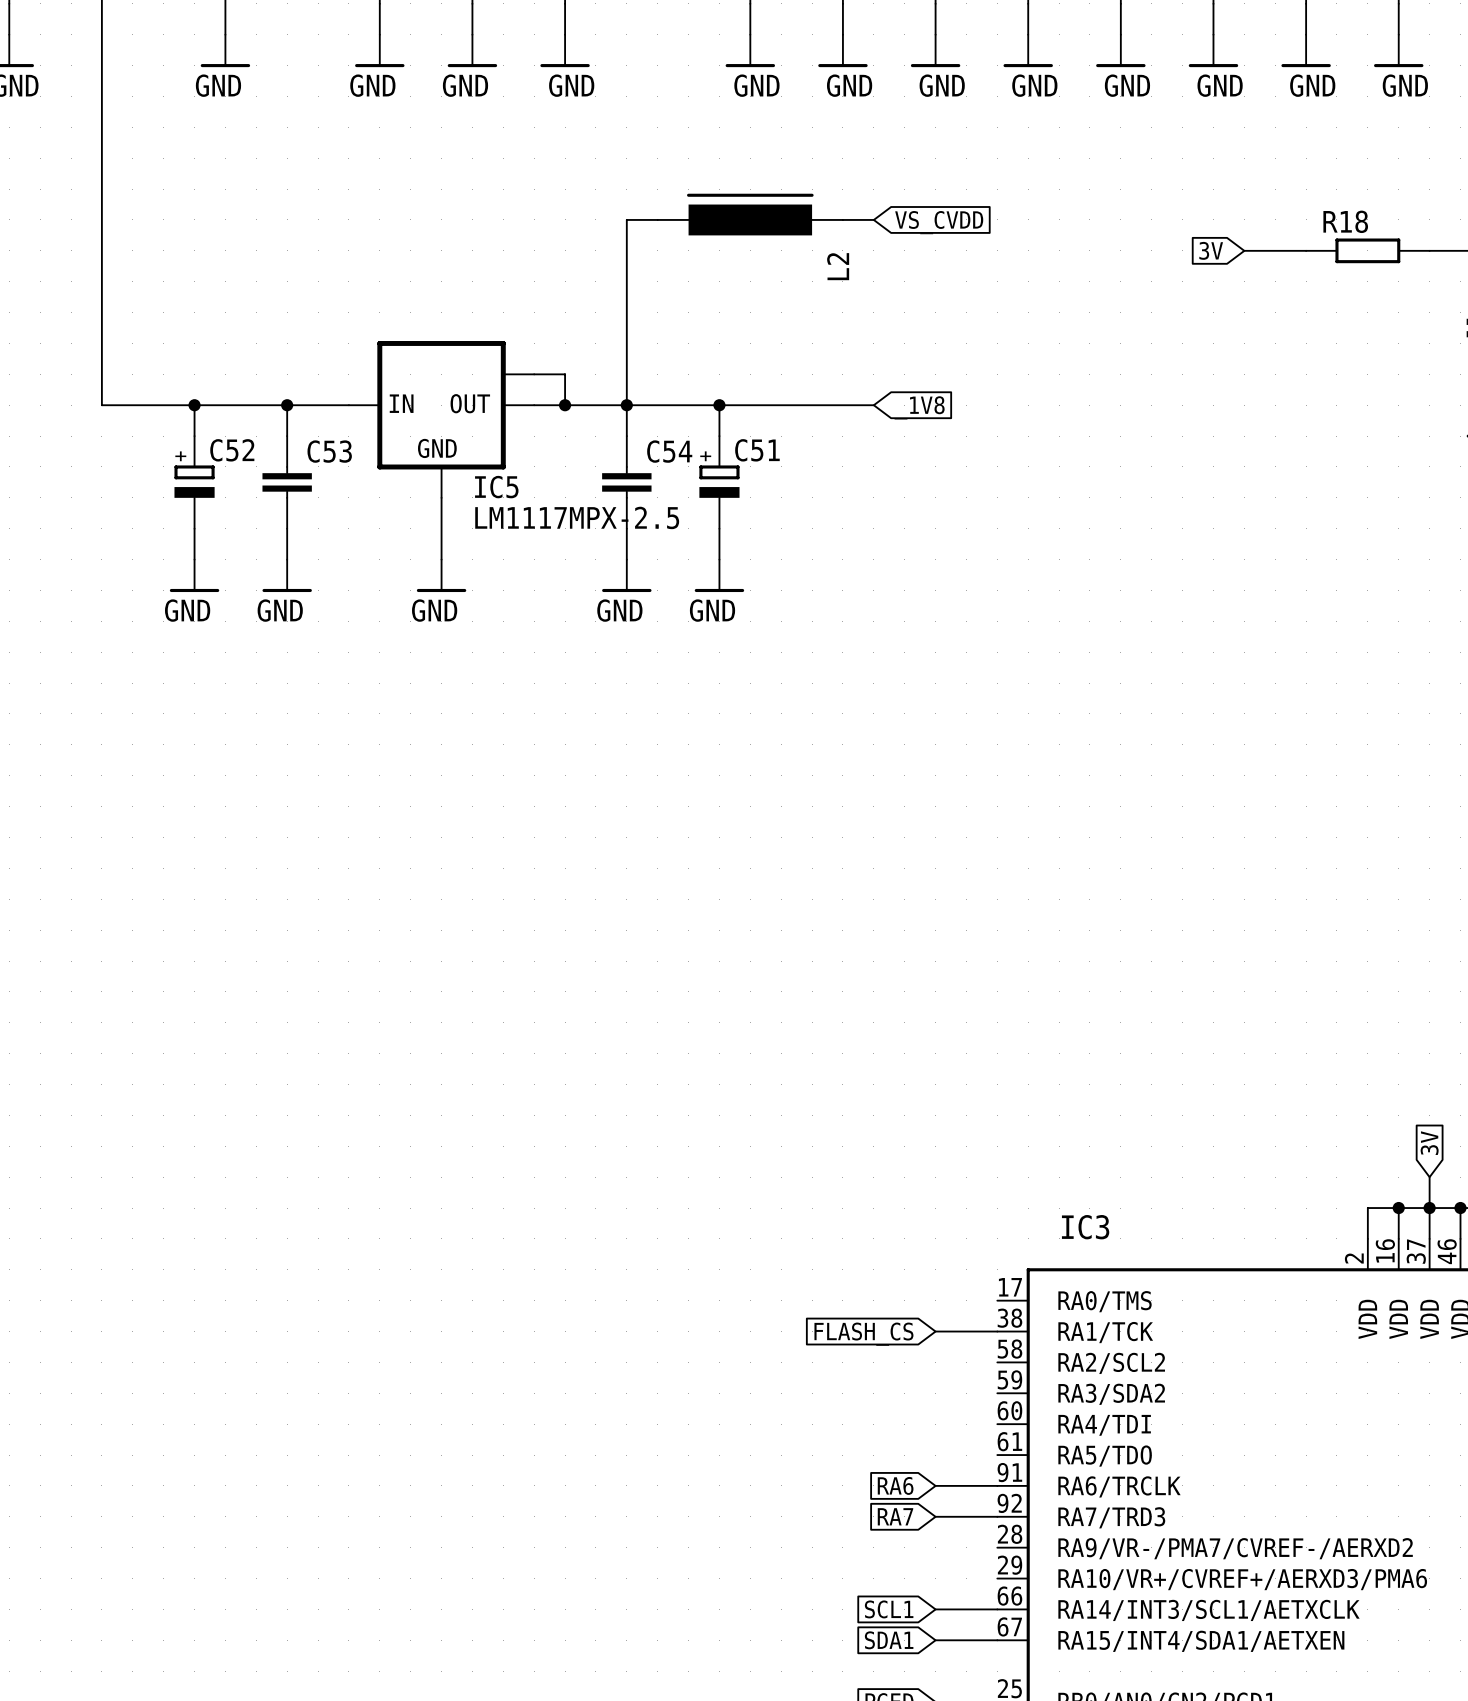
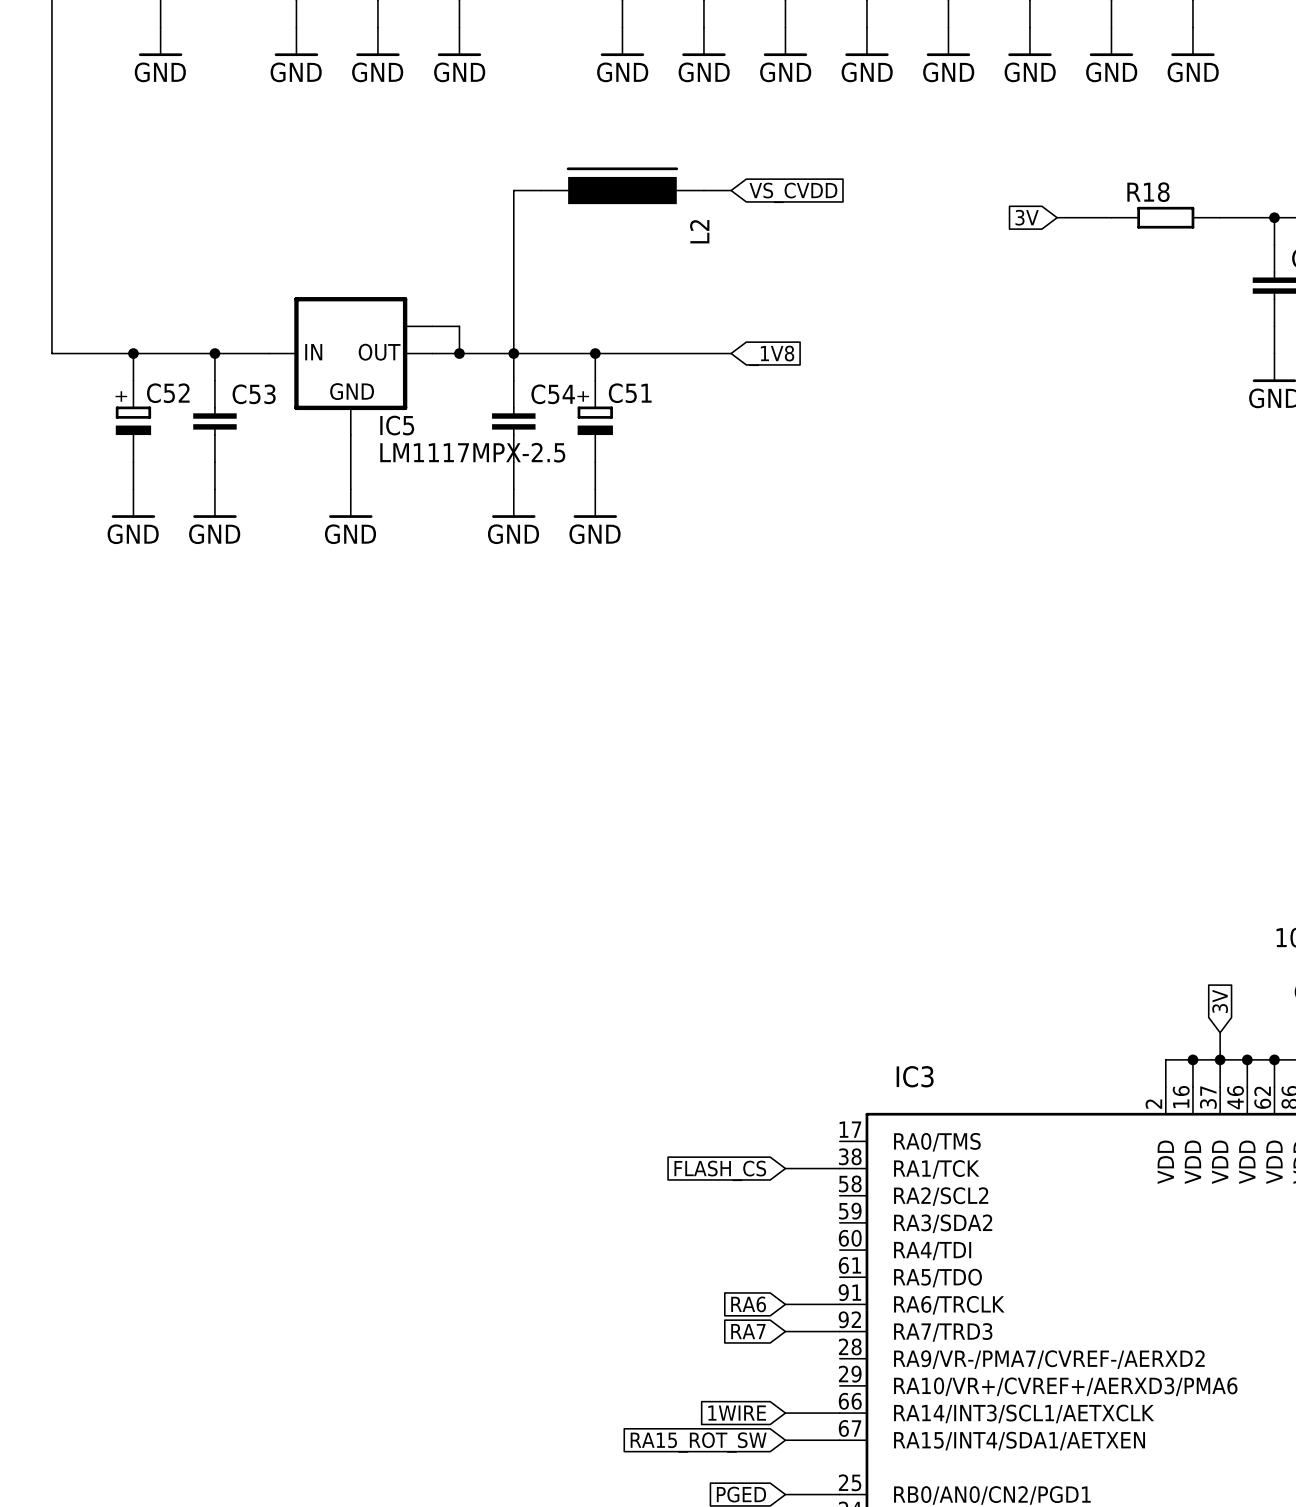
global label: SCL1 (889, 1609) -> 1WIRE (737, 1413)
global label: SDA1 (889, 1640) -> RA15_ROT_SW (698, 1442)

